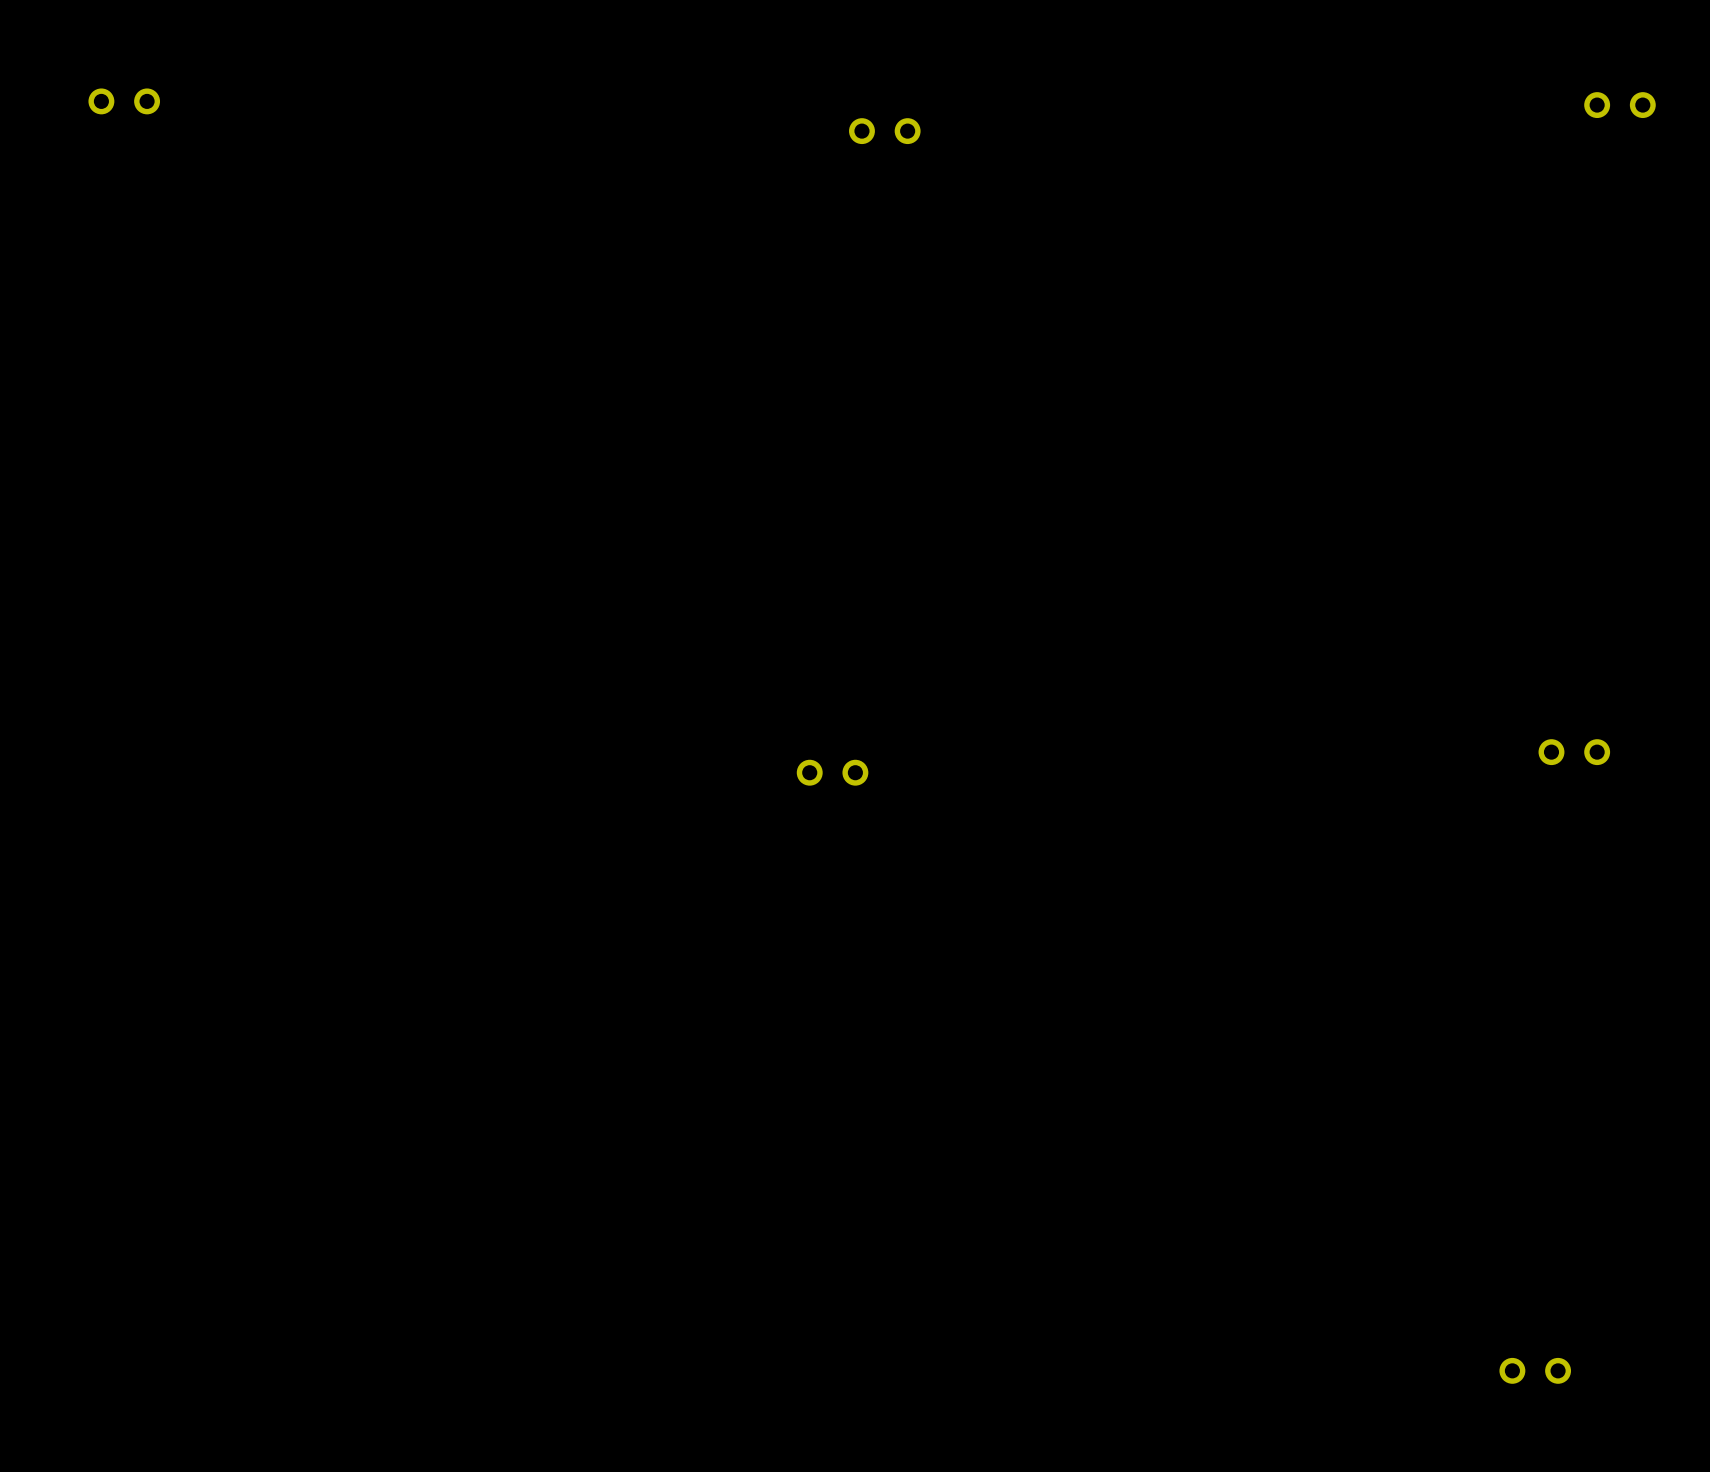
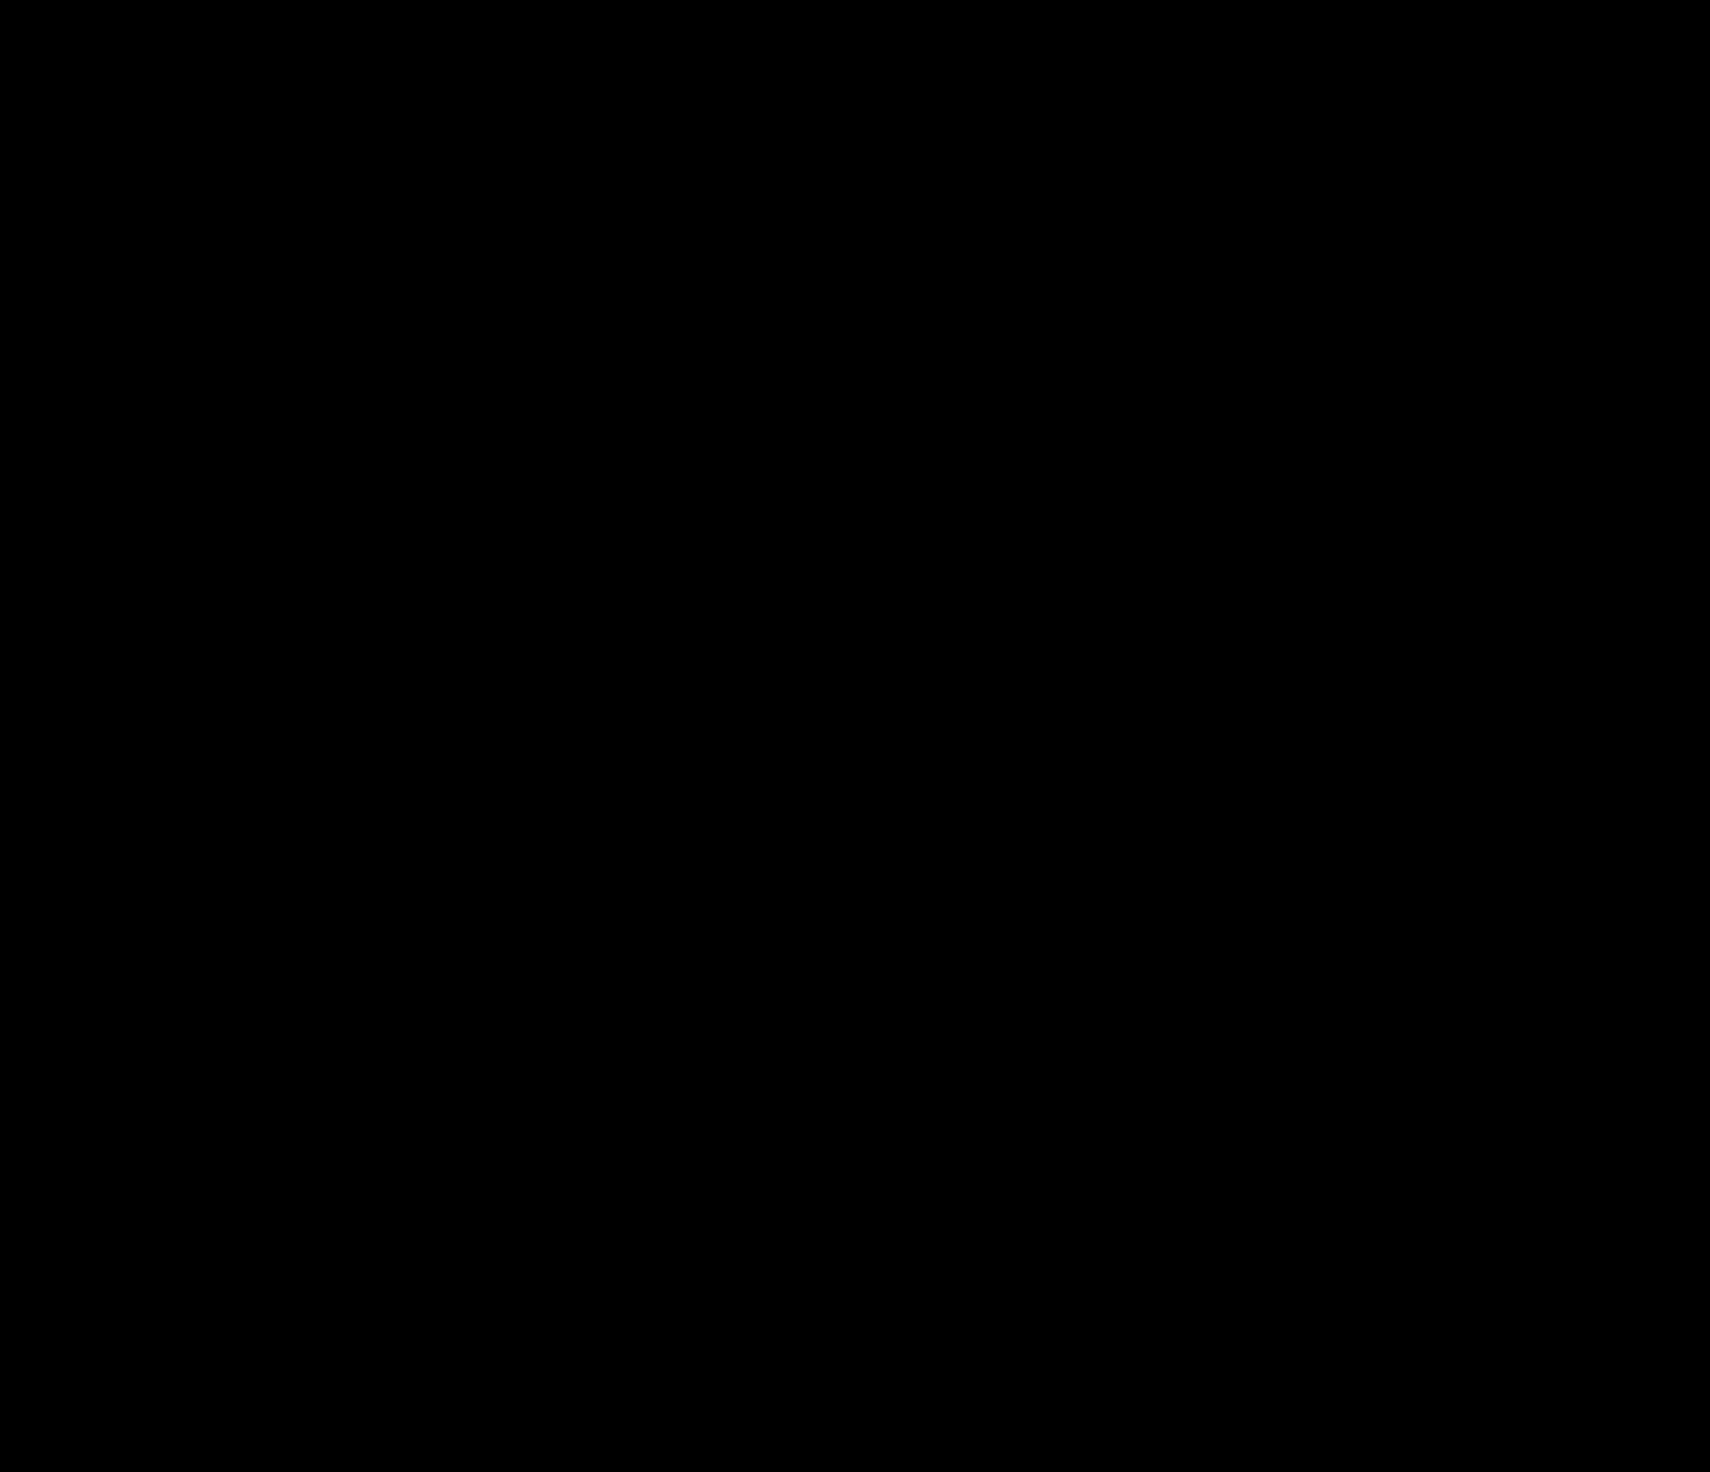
part: (124, 101) -> none
part: (1619, 105) -> none
part: (884, 131) -> none
part: (1574, 752) -> none
part: (832, 772) -> none
part: (1535, 1370) -> none

